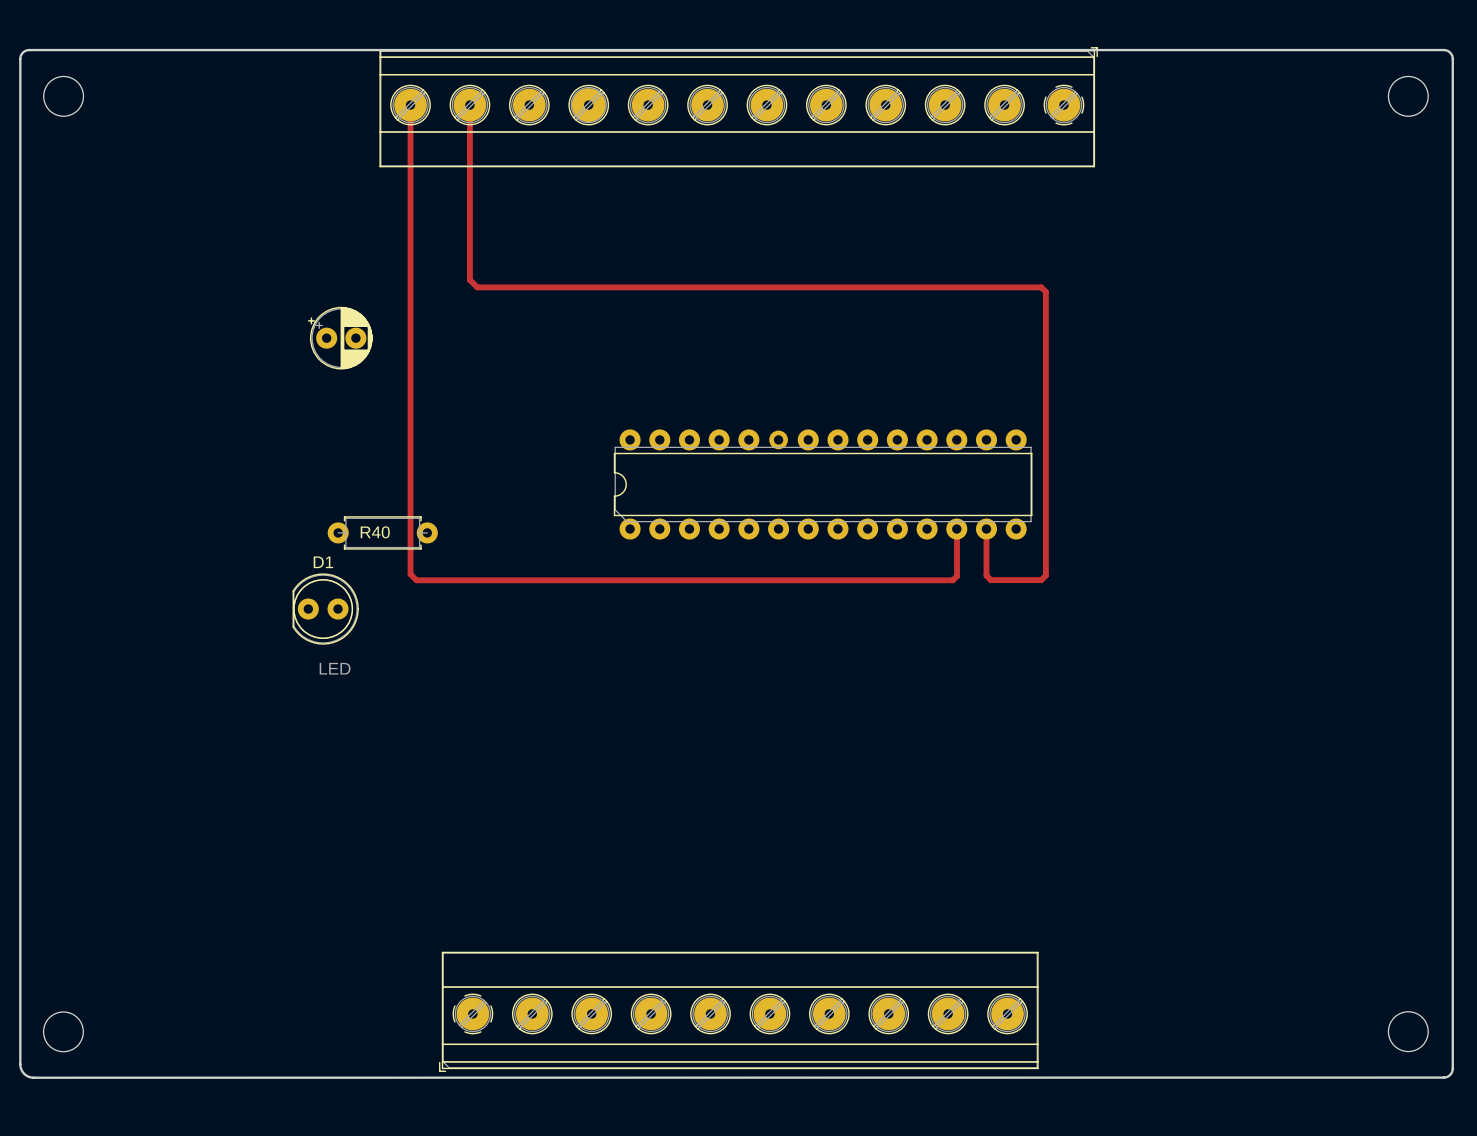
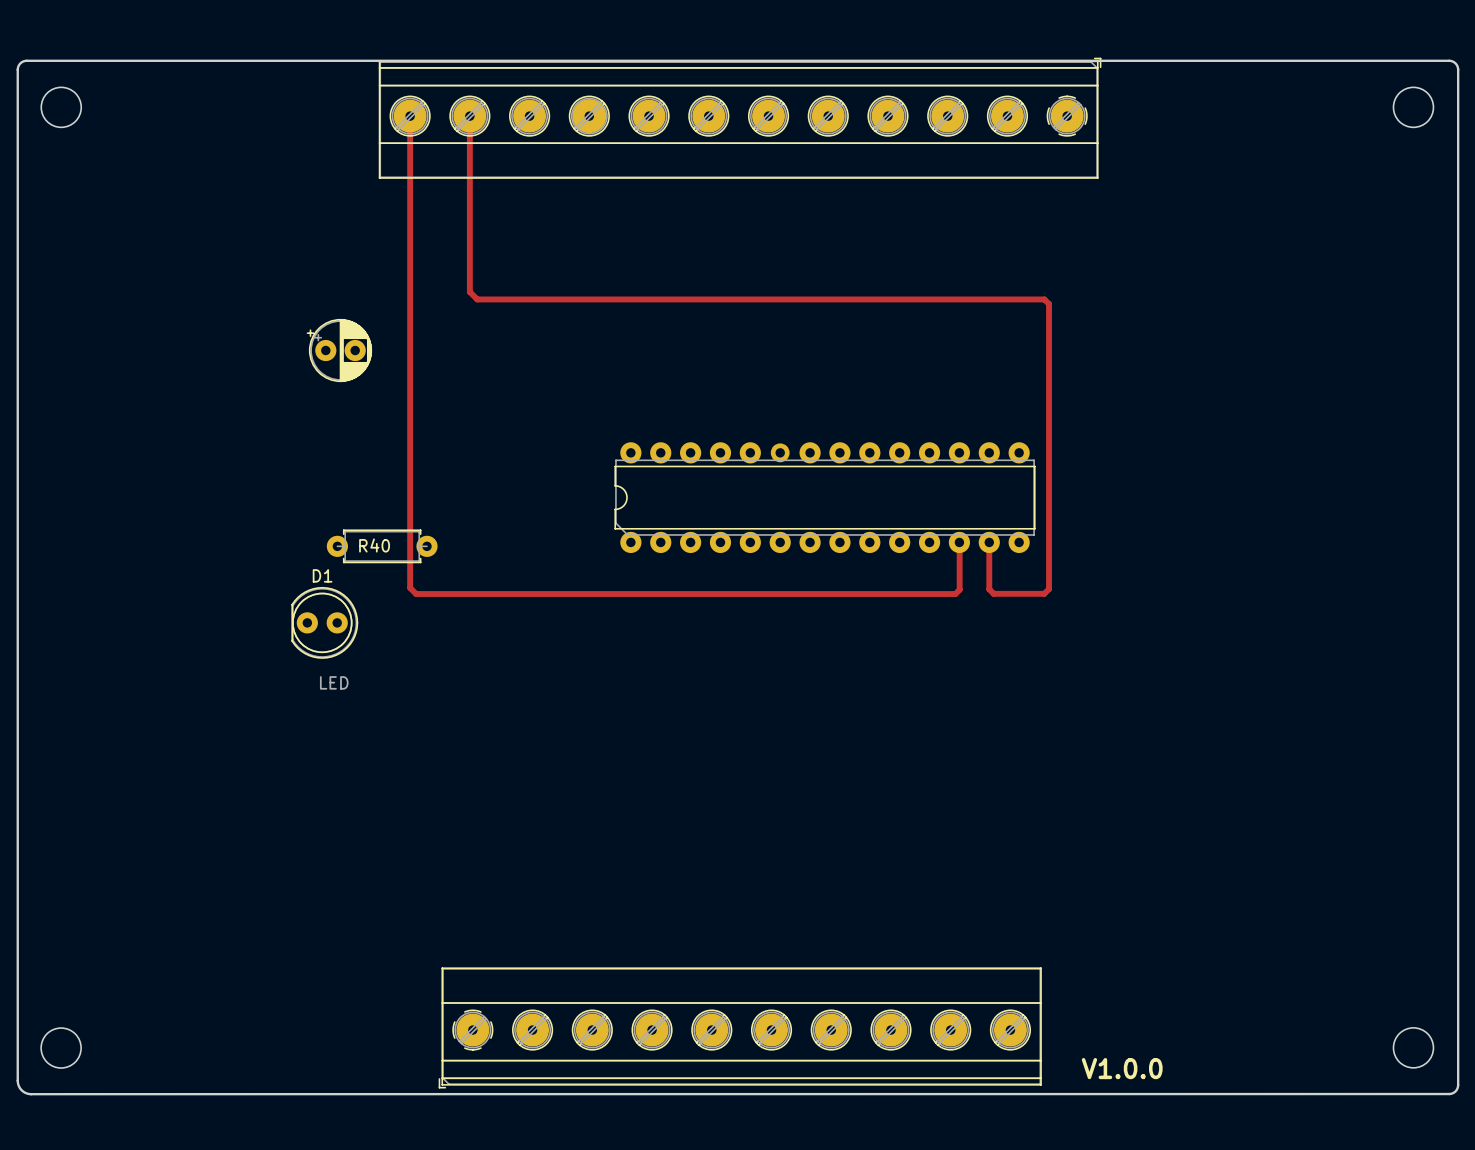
text: none -> V1.0.0 (1122, 1068)

